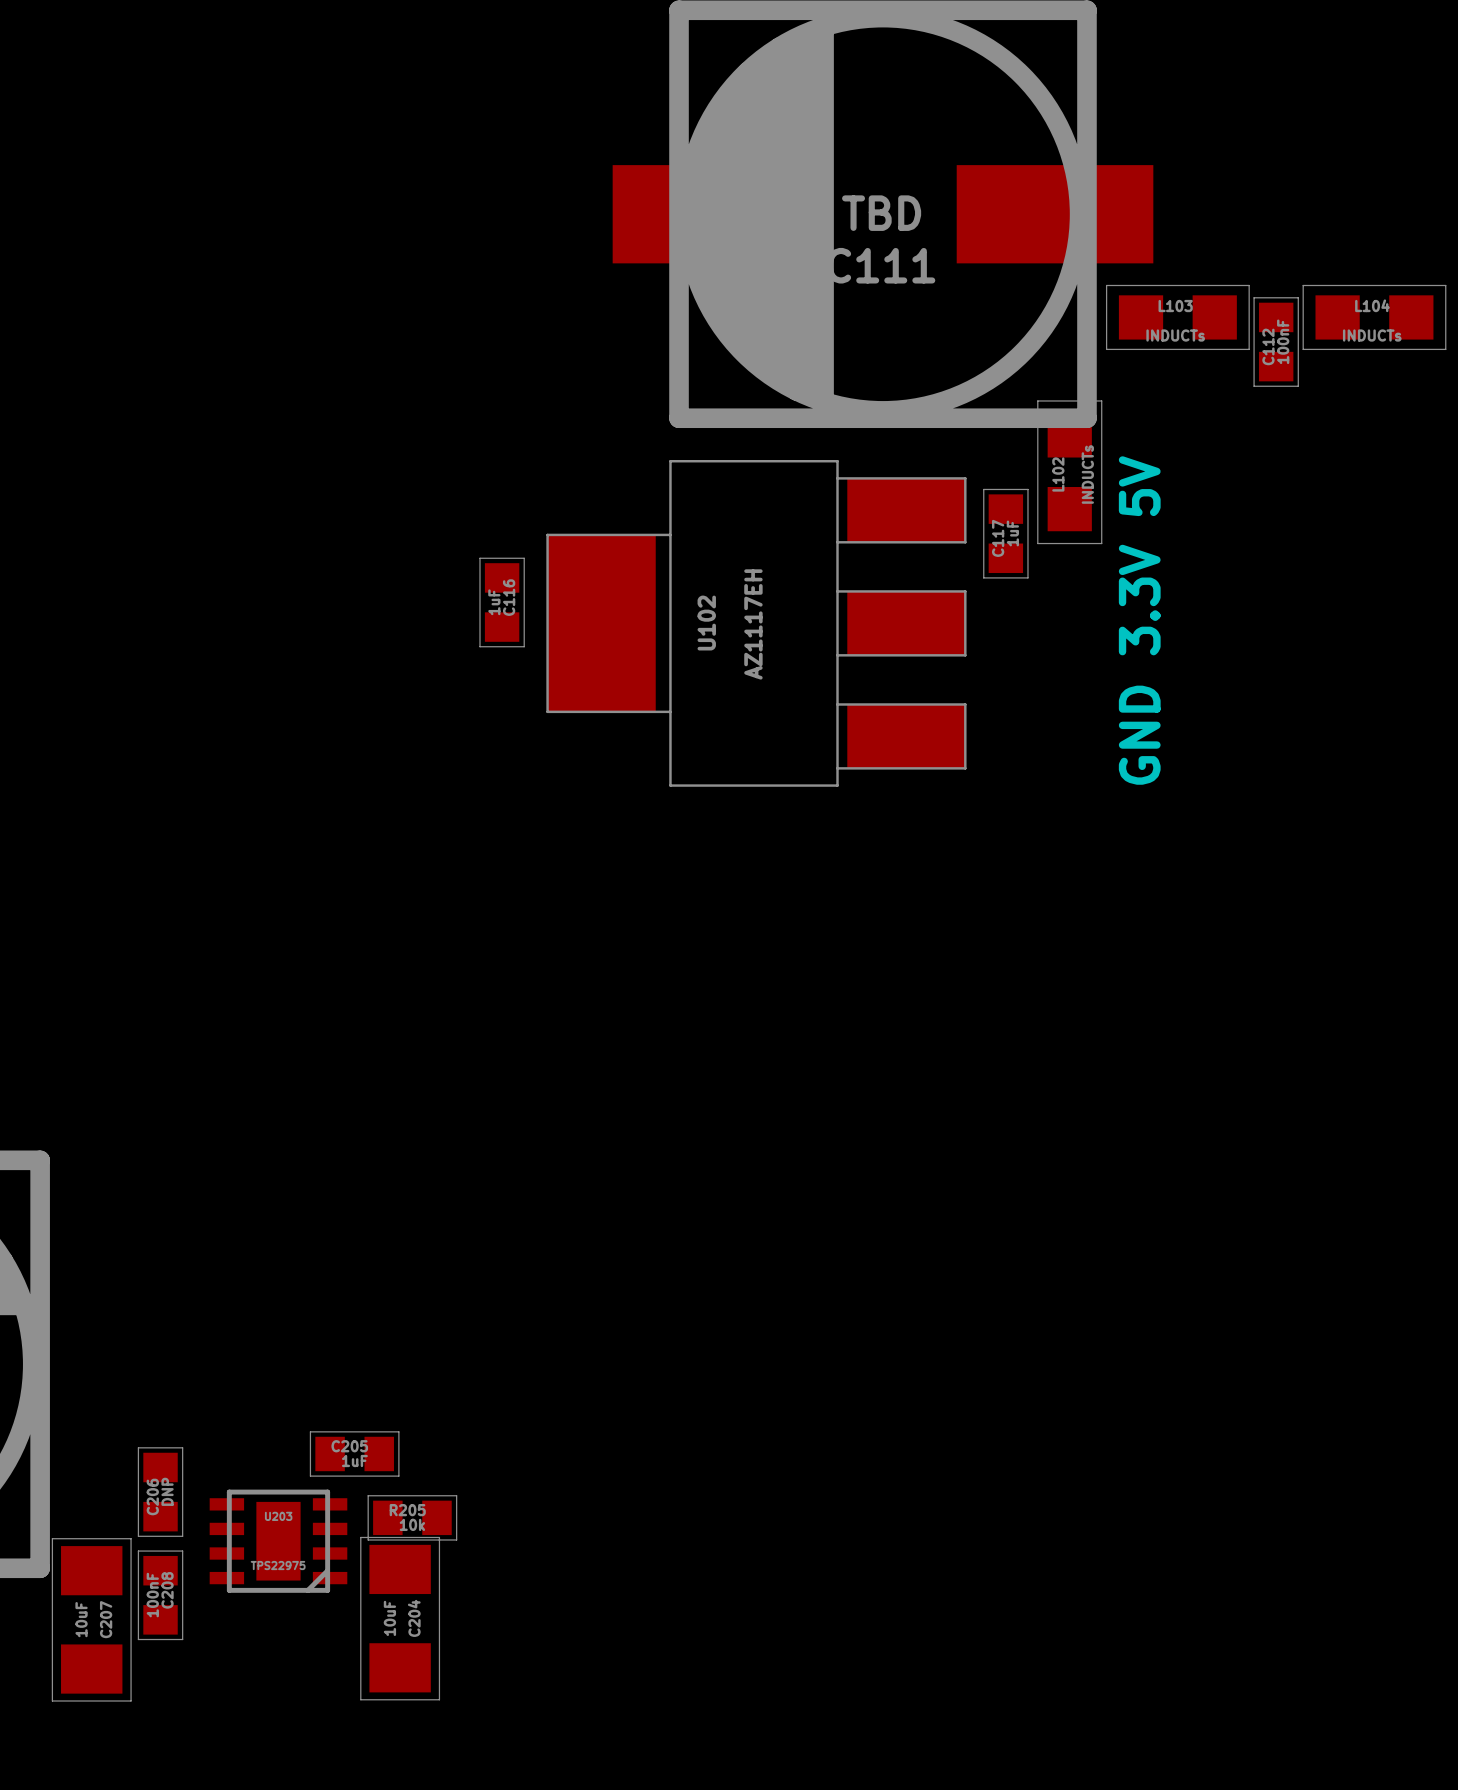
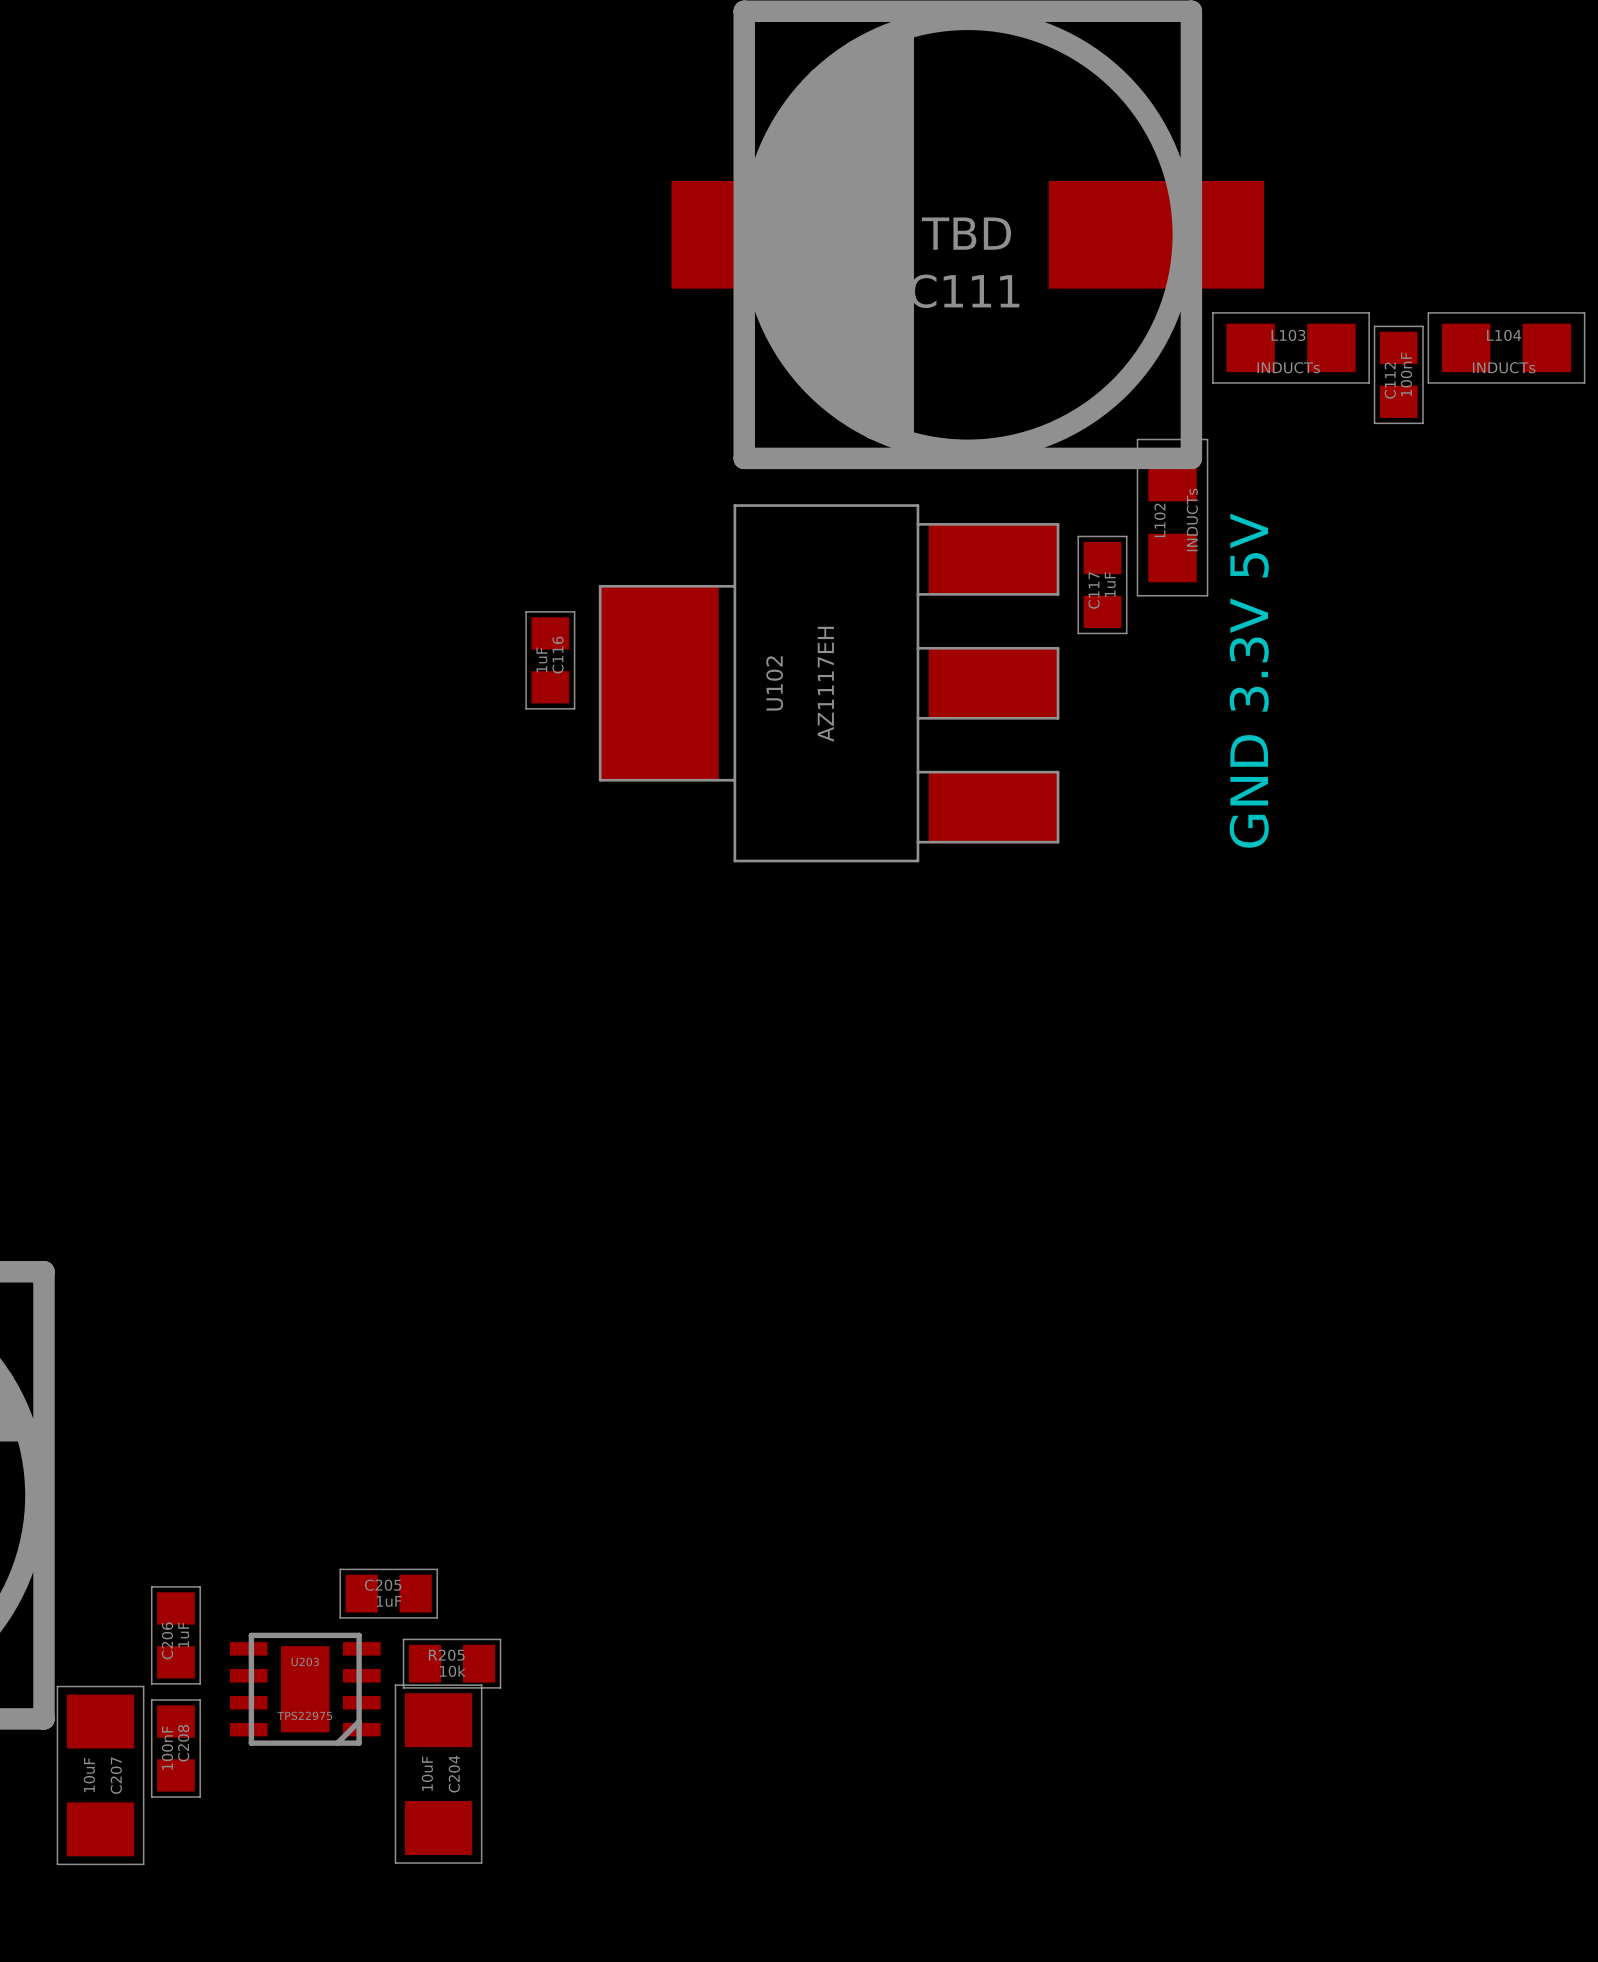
C206 value: DNP (167, 1491) -> 1uF (183, 1635)

